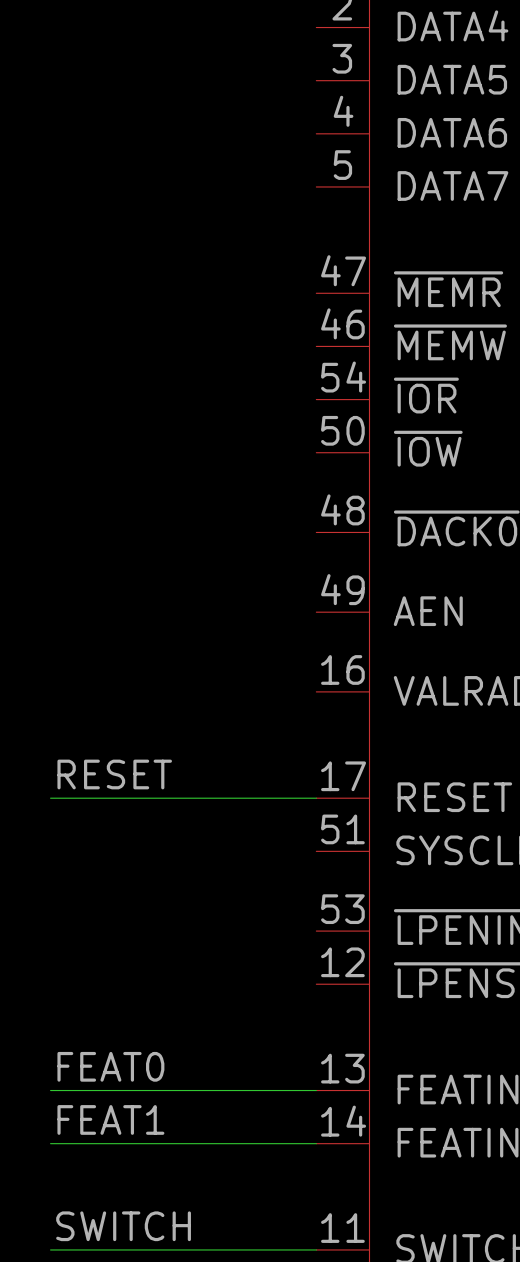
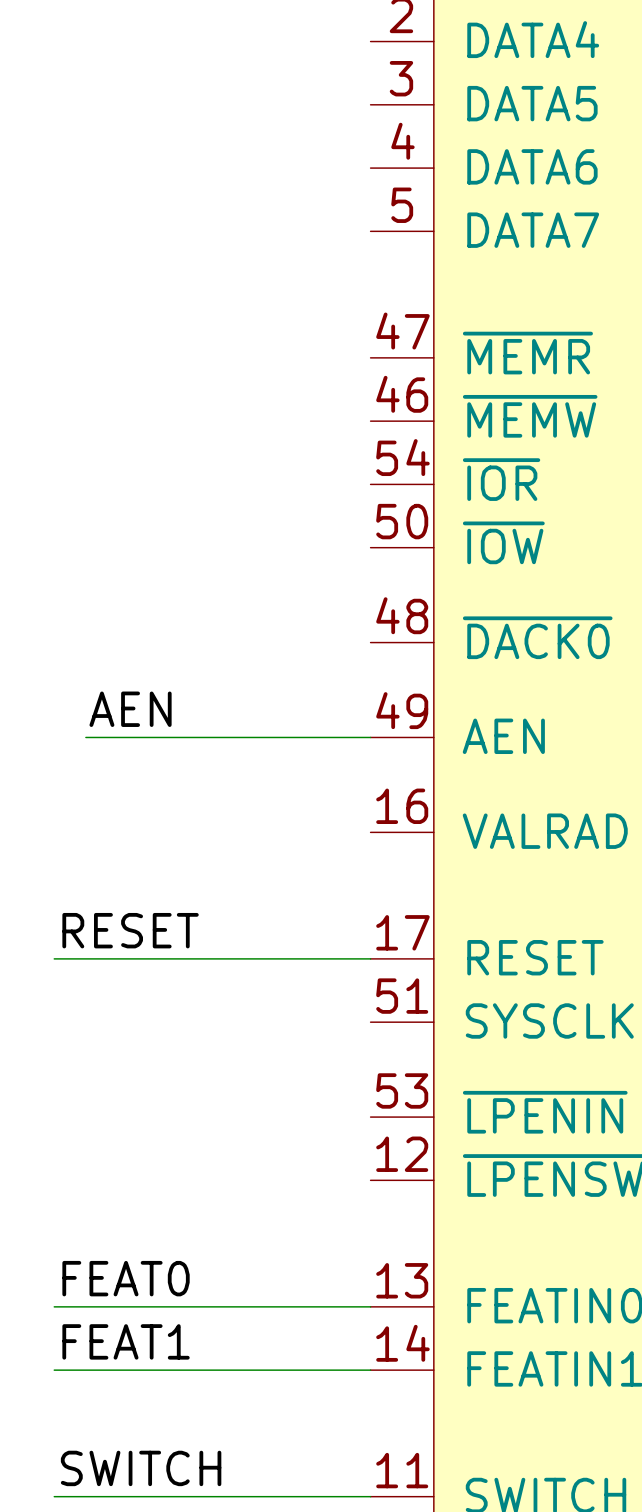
label: none -> AEN (130, 709)
wire: none -> (85, 737) (370, 737)

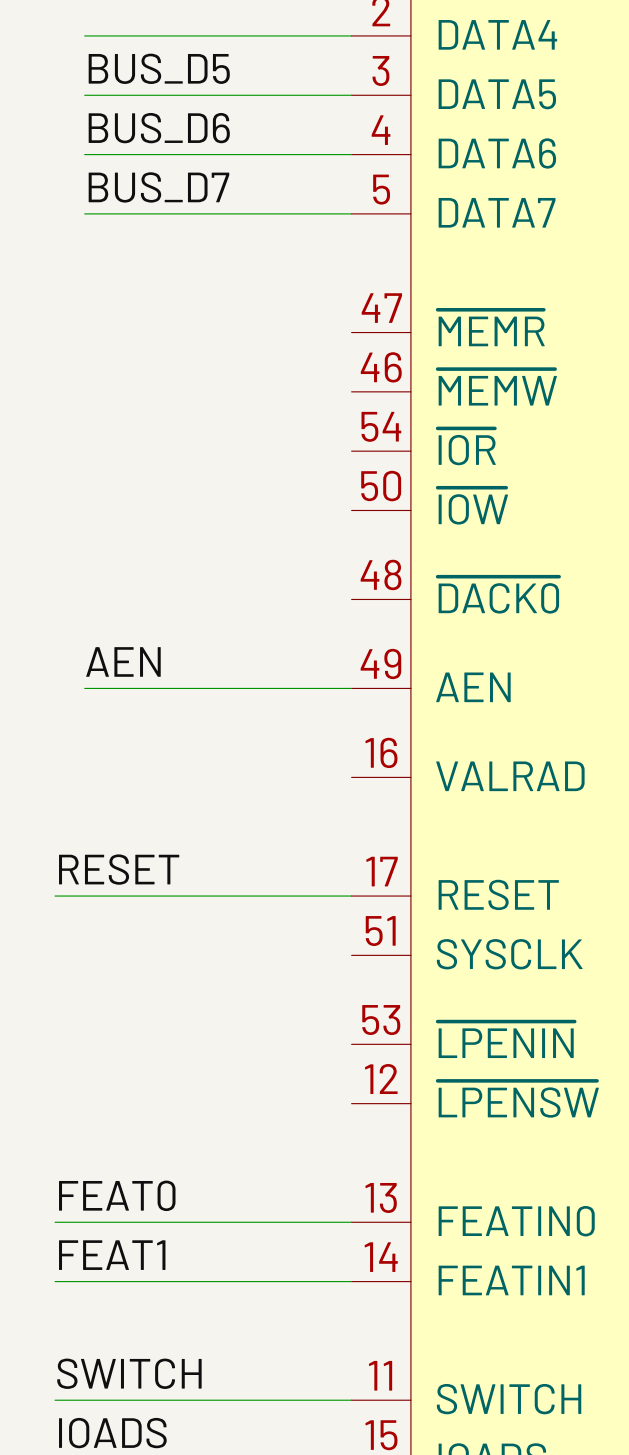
wire: none -> (84, 35) (351, 35)
label: none -> BUS_D5 (159, 68)
wire: none -> (84, 95) (351, 95)
label: none -> BUS_D6 (159, 128)
wire: none -> (84, 154) (351, 154)
label: none -> BUS_D7 (158, 187)
wire: none -> (84, 213) (351, 213)

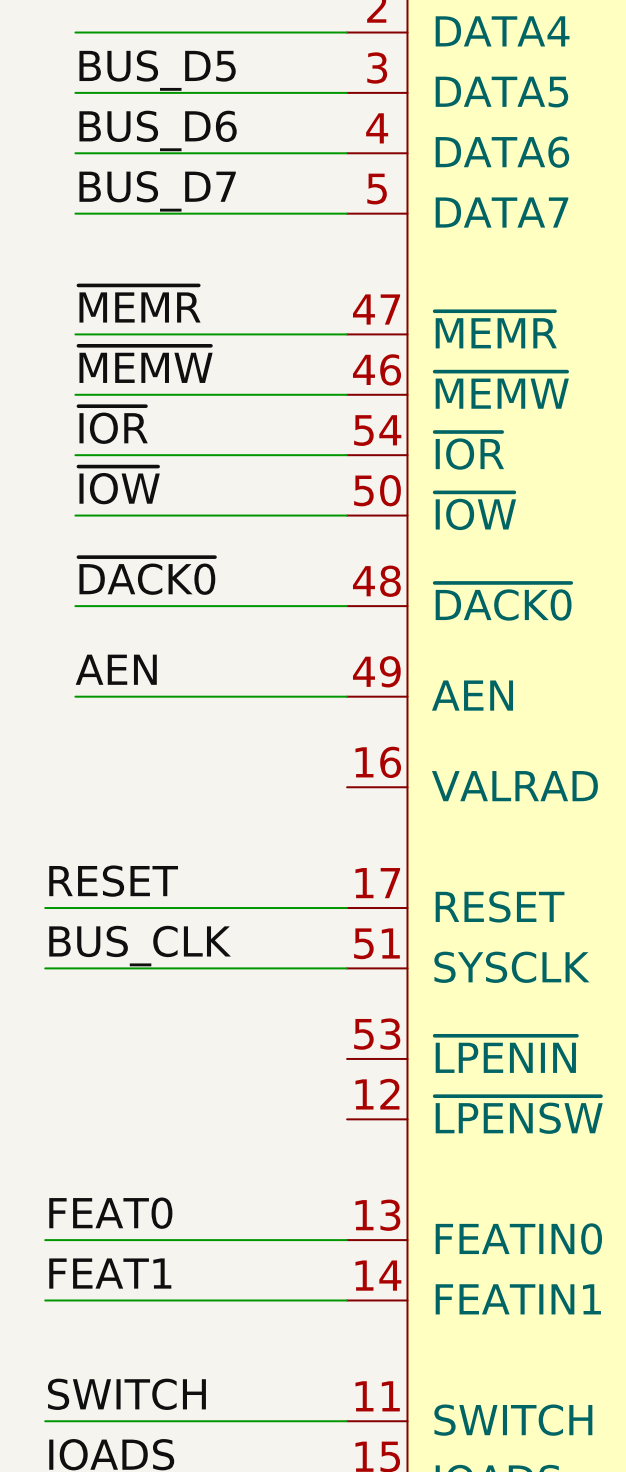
label: none -> ~{MEMR} (139, 304)
wire: none -> (75, 334) (347, 334)
label: none -> ~{MEMW} (145, 364)
wire: none -> (75, 394) (347, 394)
label: none -> ~{IOR} (113, 425)
wire: none -> (75, 455) (347, 455)
label: none -> ~{IOW} (119, 485)
wire: none -> (75, 515) (347, 515)
label: none -> ~{DACK0} (146, 576)
wire: none -> (75, 606) (347, 606)
label: none -> BUS_CLK (140, 946)
wire: none -> (45, 968) (347, 968)

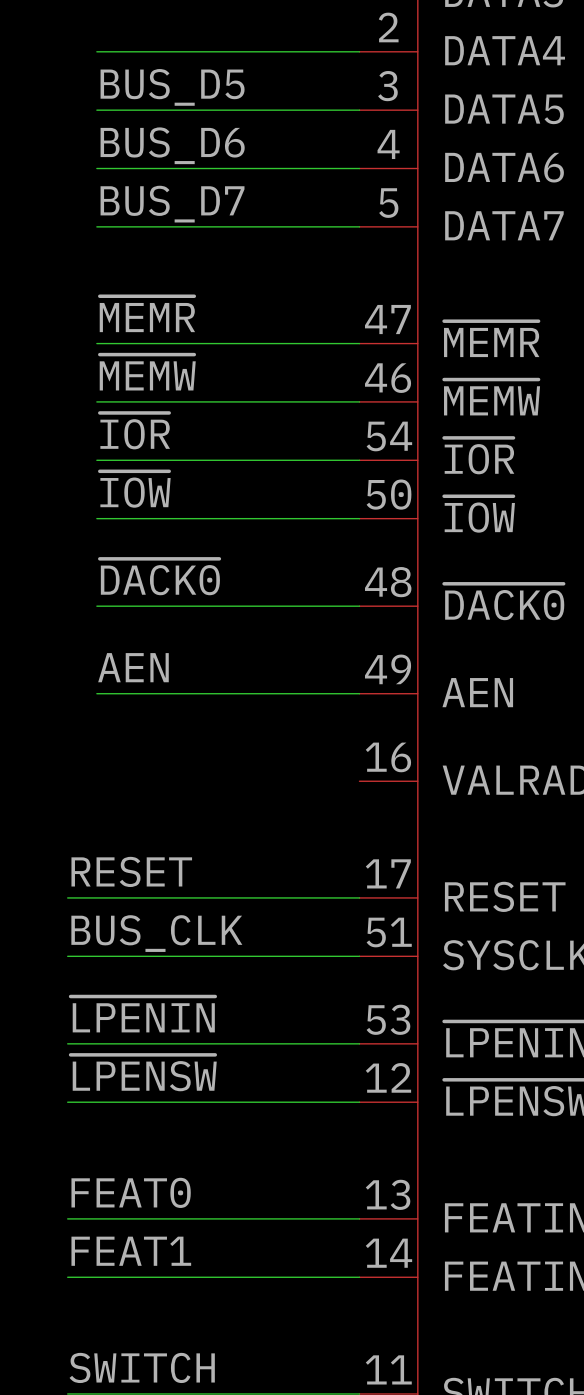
label: none -> ~{LPENIN} (142, 1014)
wire: none -> (67, 1043) (359, 1043)
label: none -> ~{LPENSW} (143, 1073)
wire: none -> (67, 1102) (359, 1102)

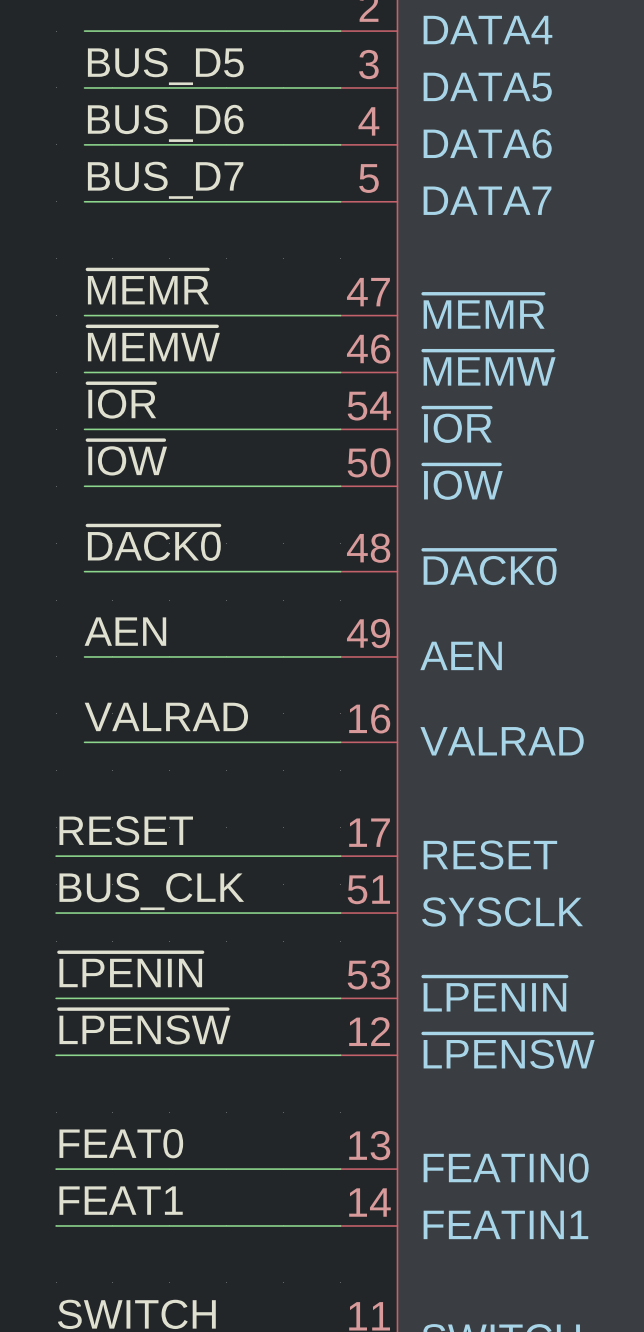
label: none -> VALRAD (166, 716)
wire: none -> (84, 742) (340, 742)

